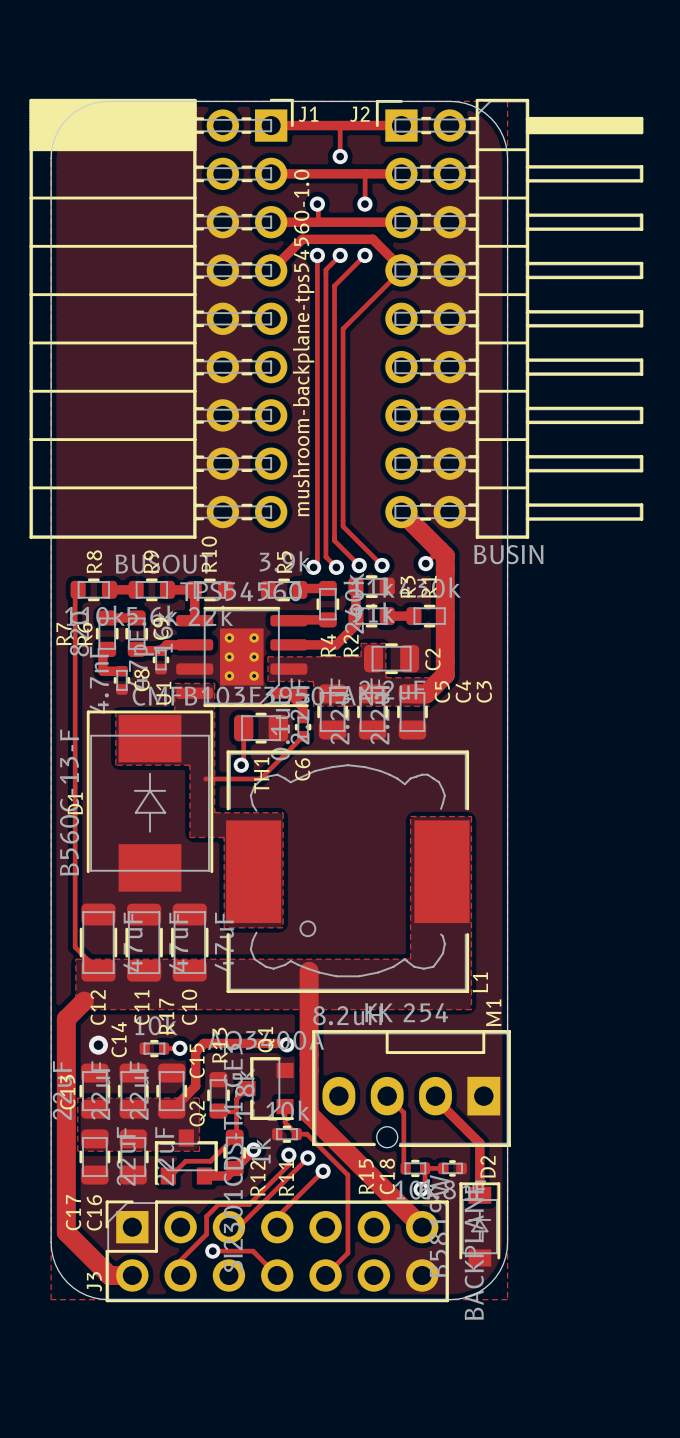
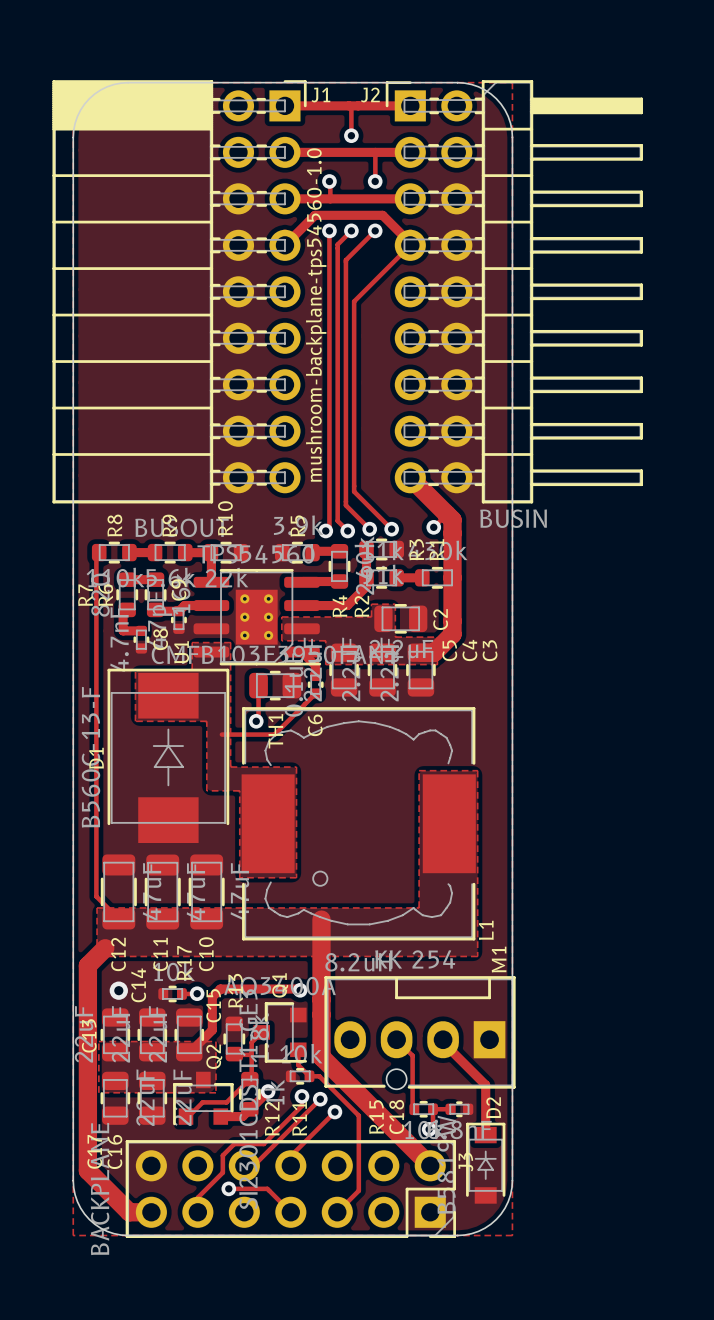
J3 rotation: 0° (277, 1251) -> 180° (290, 1189)

